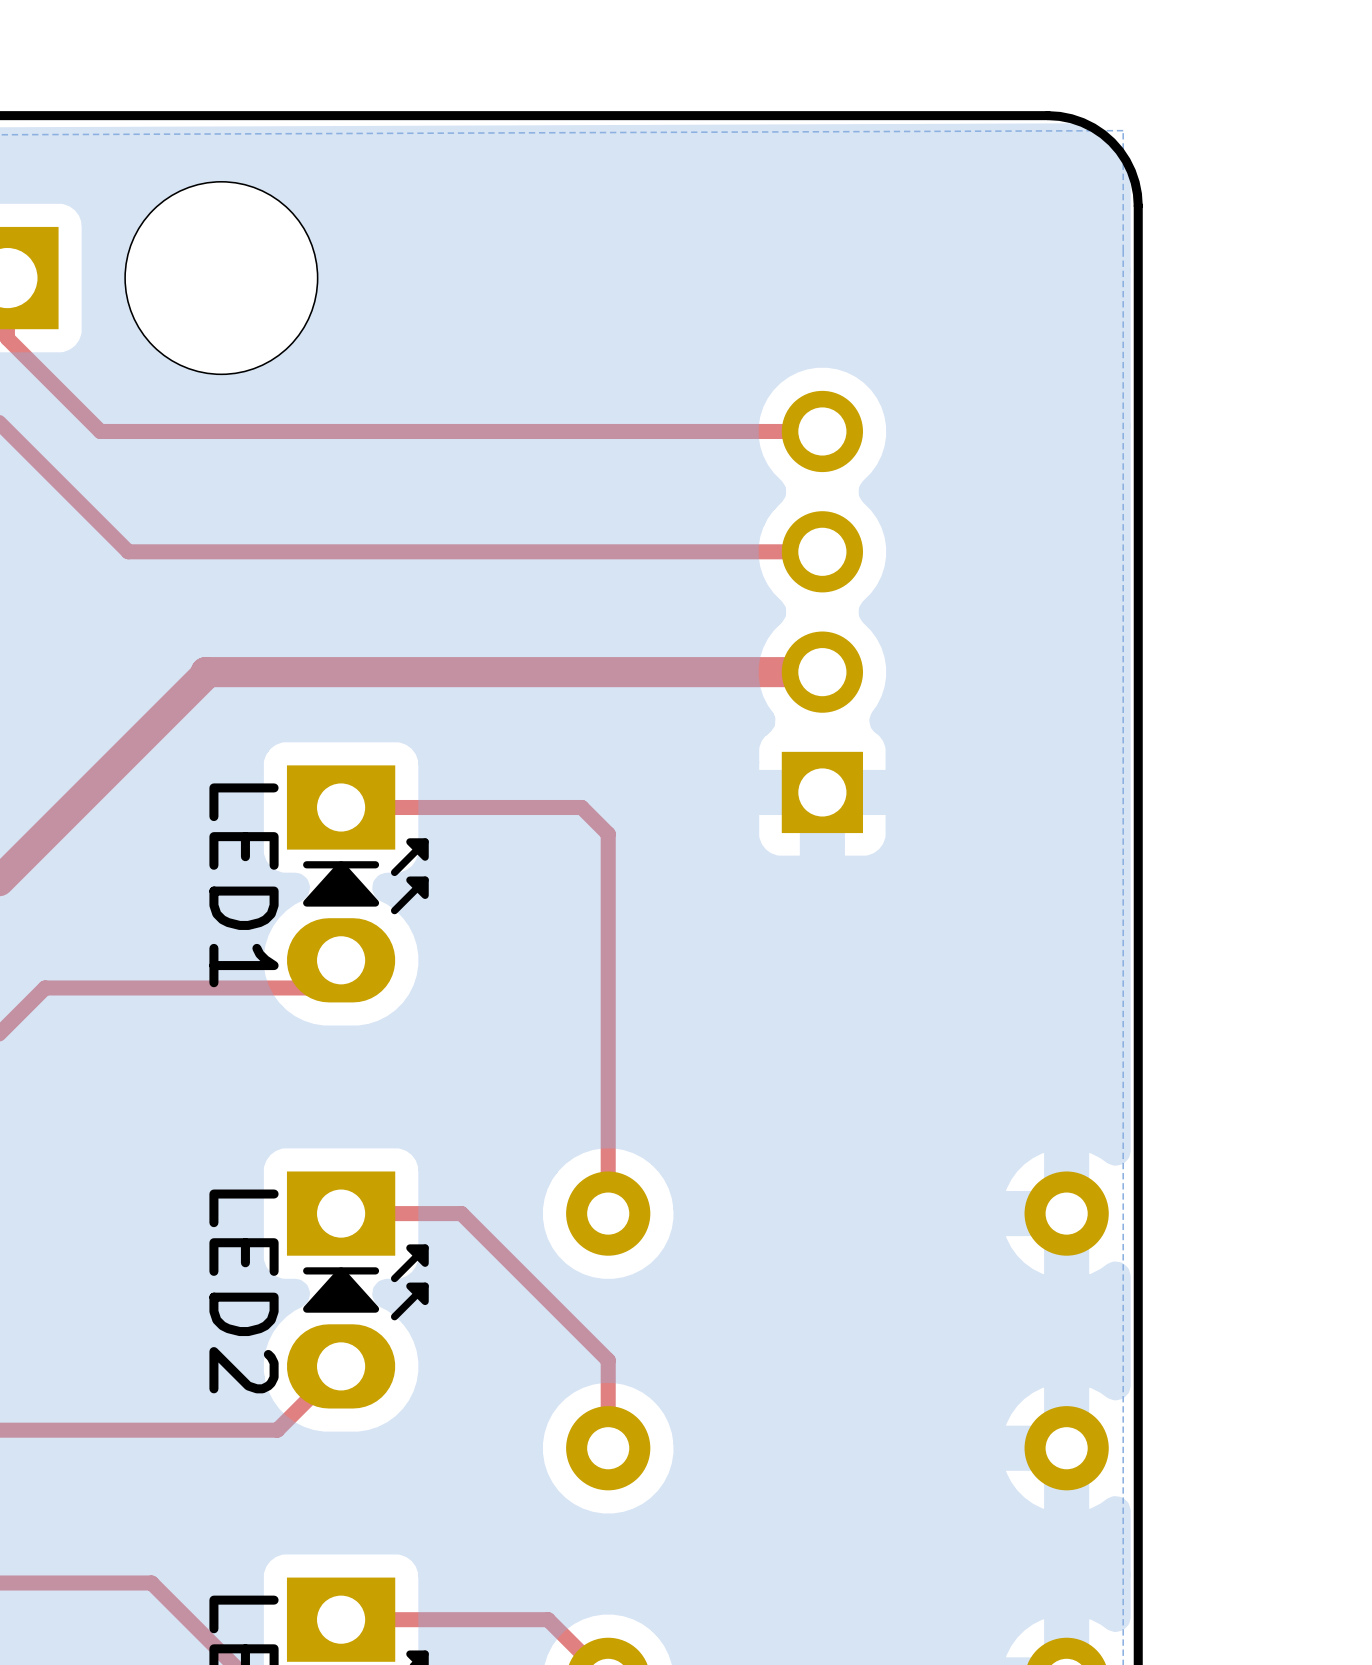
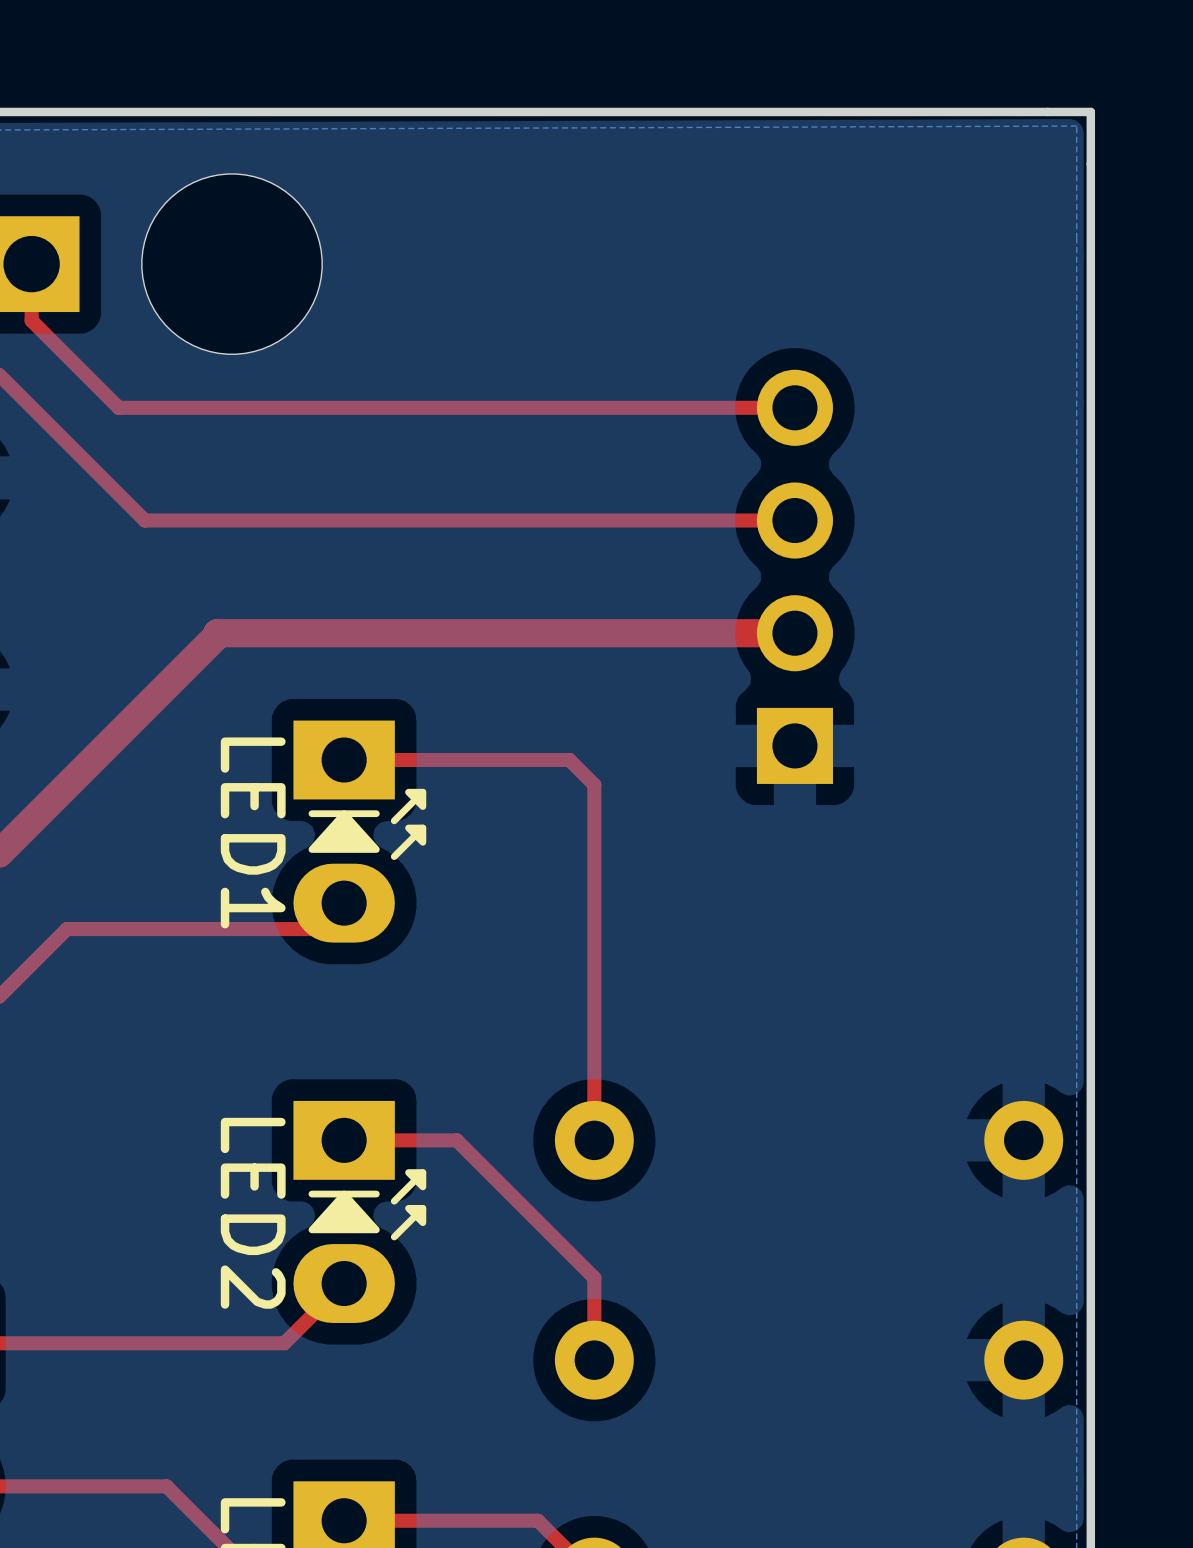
board edge: (1048, 115) (1071, 118) (1082, 122) (1093, 127) (1111, 142) (1126, 160) (1131, 171) (1137, 194) (1138, 205) -> (1006, 111) (1090, 111) (1090, 196)

